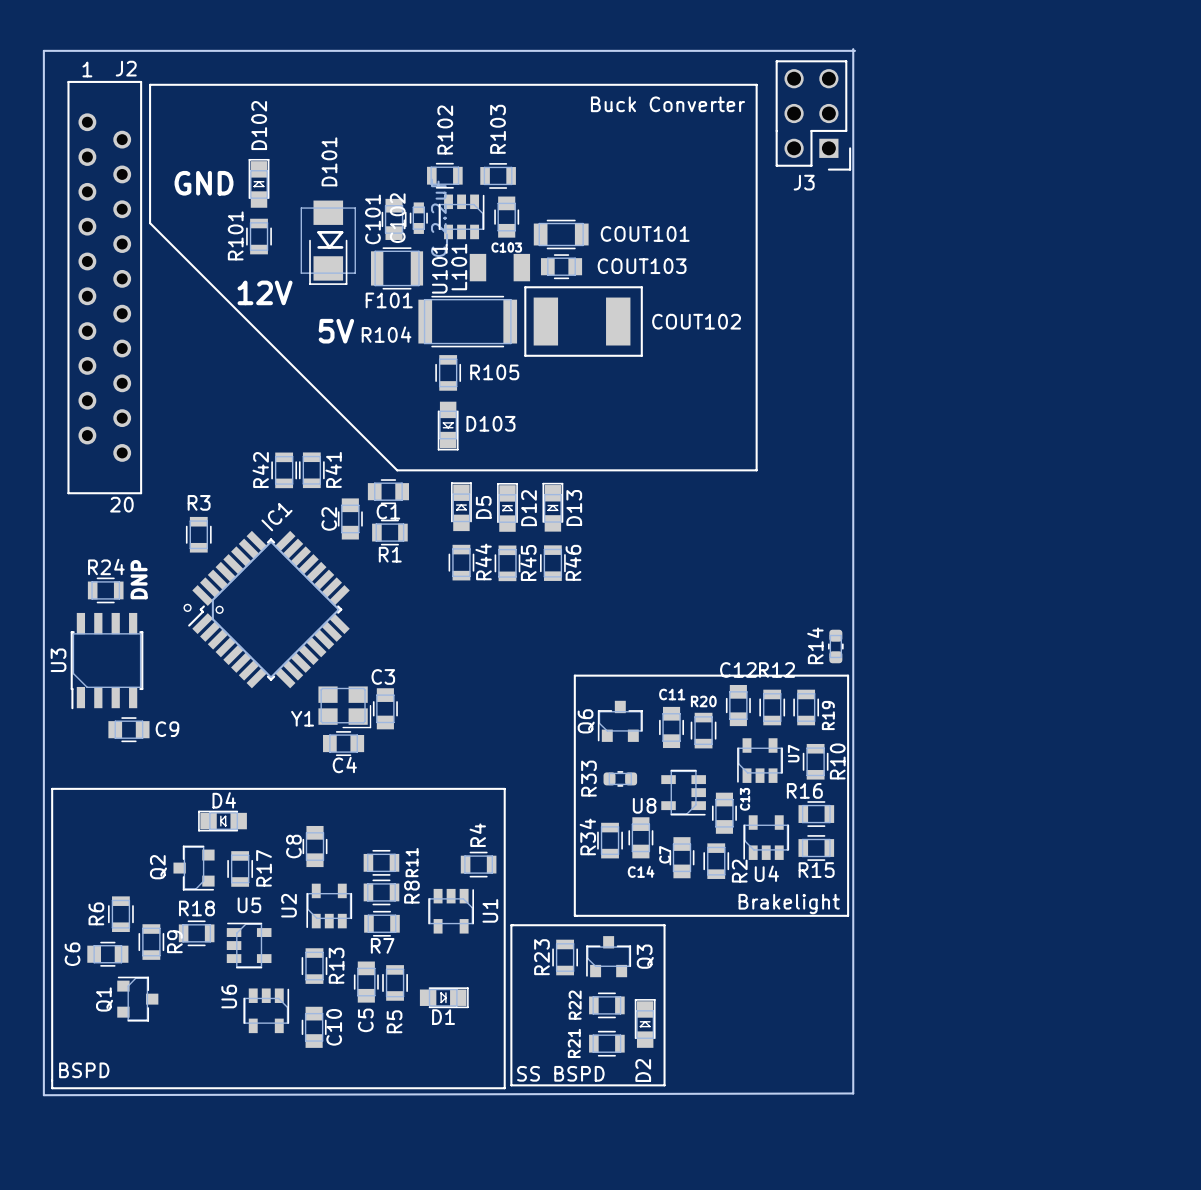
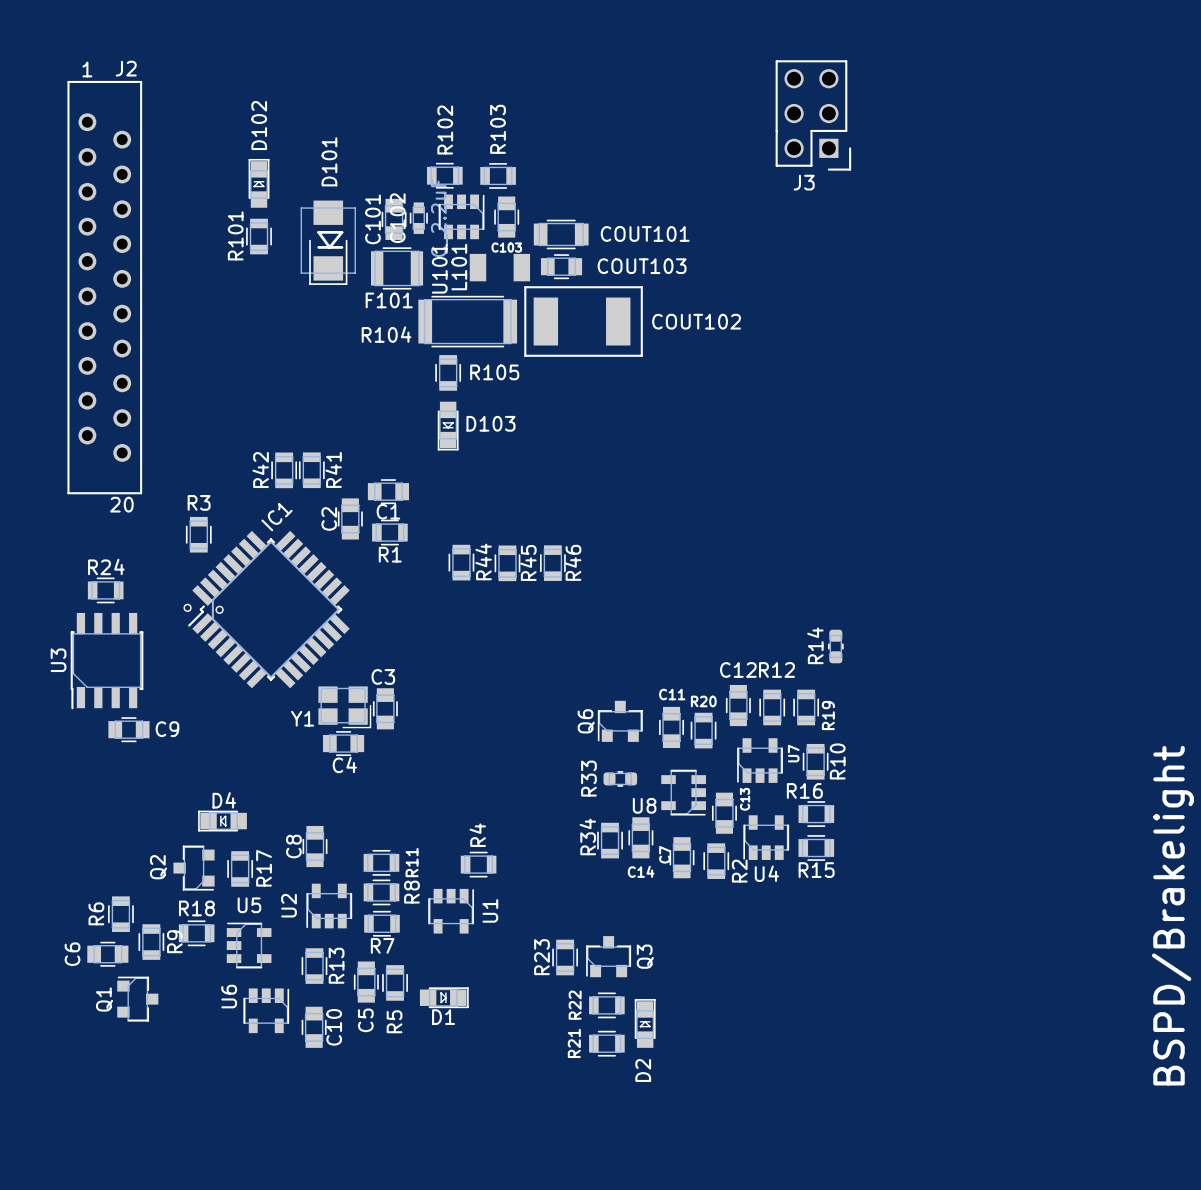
board edge: (853, 49) (853, 1093) (43, 1095) (43, 50) (854, 50) -> none
line: (150, 84) (756, 84) (756, 470) (397, 470) (150, 223) (150, 84) -> none
text: Buck Converter (667, 104) -> none
text: GND (204, 183) -> none
text: 12V (265, 292) -> none
text: 5V (336, 331) -> none
D5: (461, 506) -> none
D12: (507, 507) -> none
D13: (552, 507) -> none
text: DNP (139, 579) -> none
line: (574, 675) (848, 675) (848, 915) (574, 915) (574, 675) -> none
line: (504, 788) (52, 788) (52, 1088) (504, 1088) (504, 788) -> none
text: Brakelight (789, 904) -> none
text: none -> BSPD/Brakelight (1172, 915)
line: (511, 925) (511, 1085) (664, 1085) (664, 925) (511, 925) -> none
text: BSPD (84, 1070) -> none
text: SS BSPD (560, 1073) -> none

